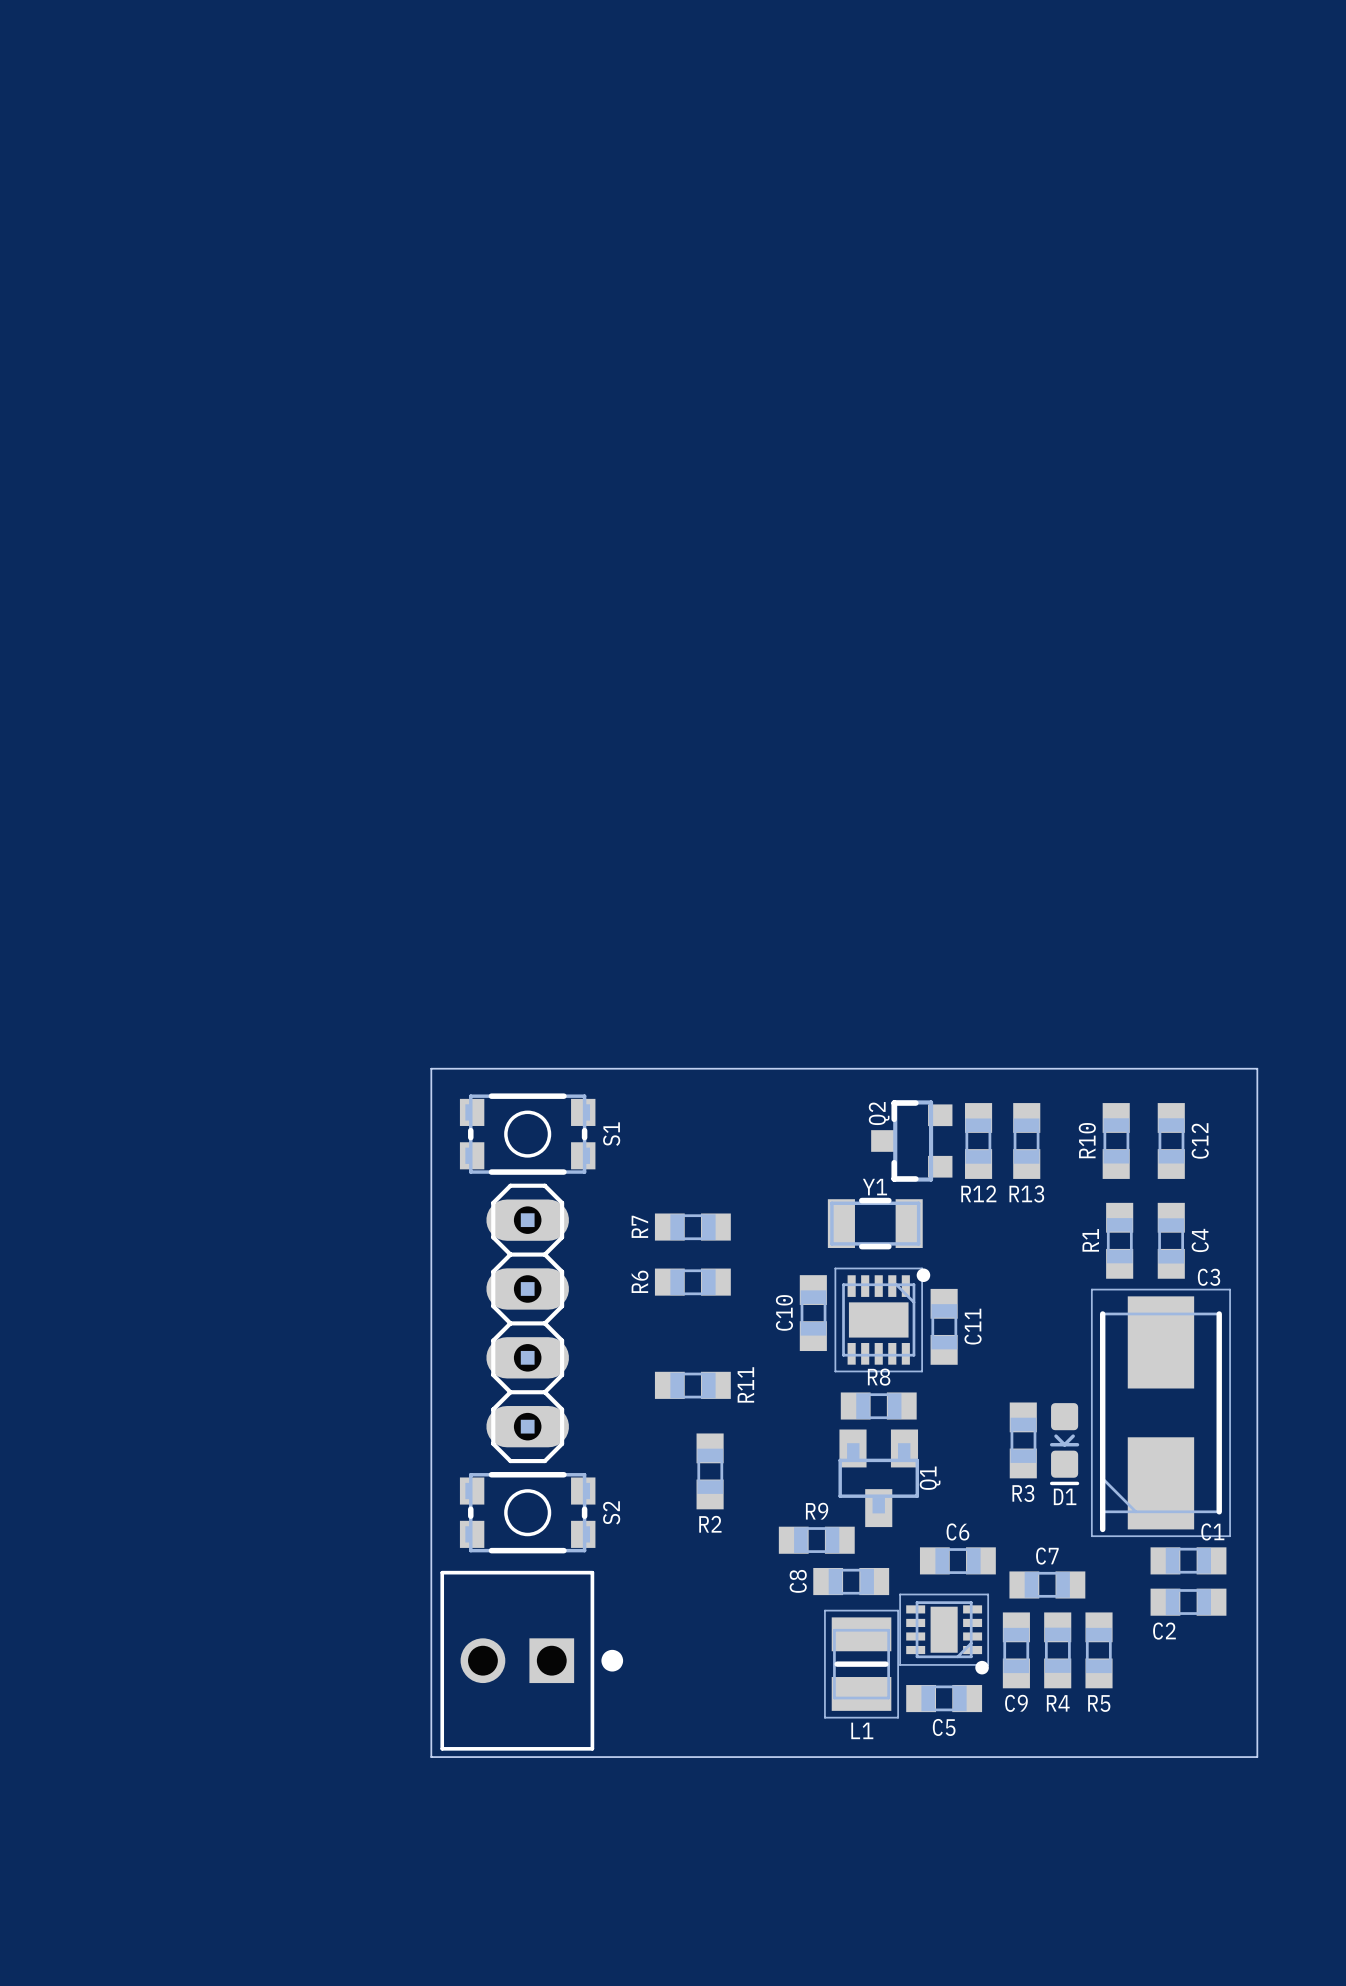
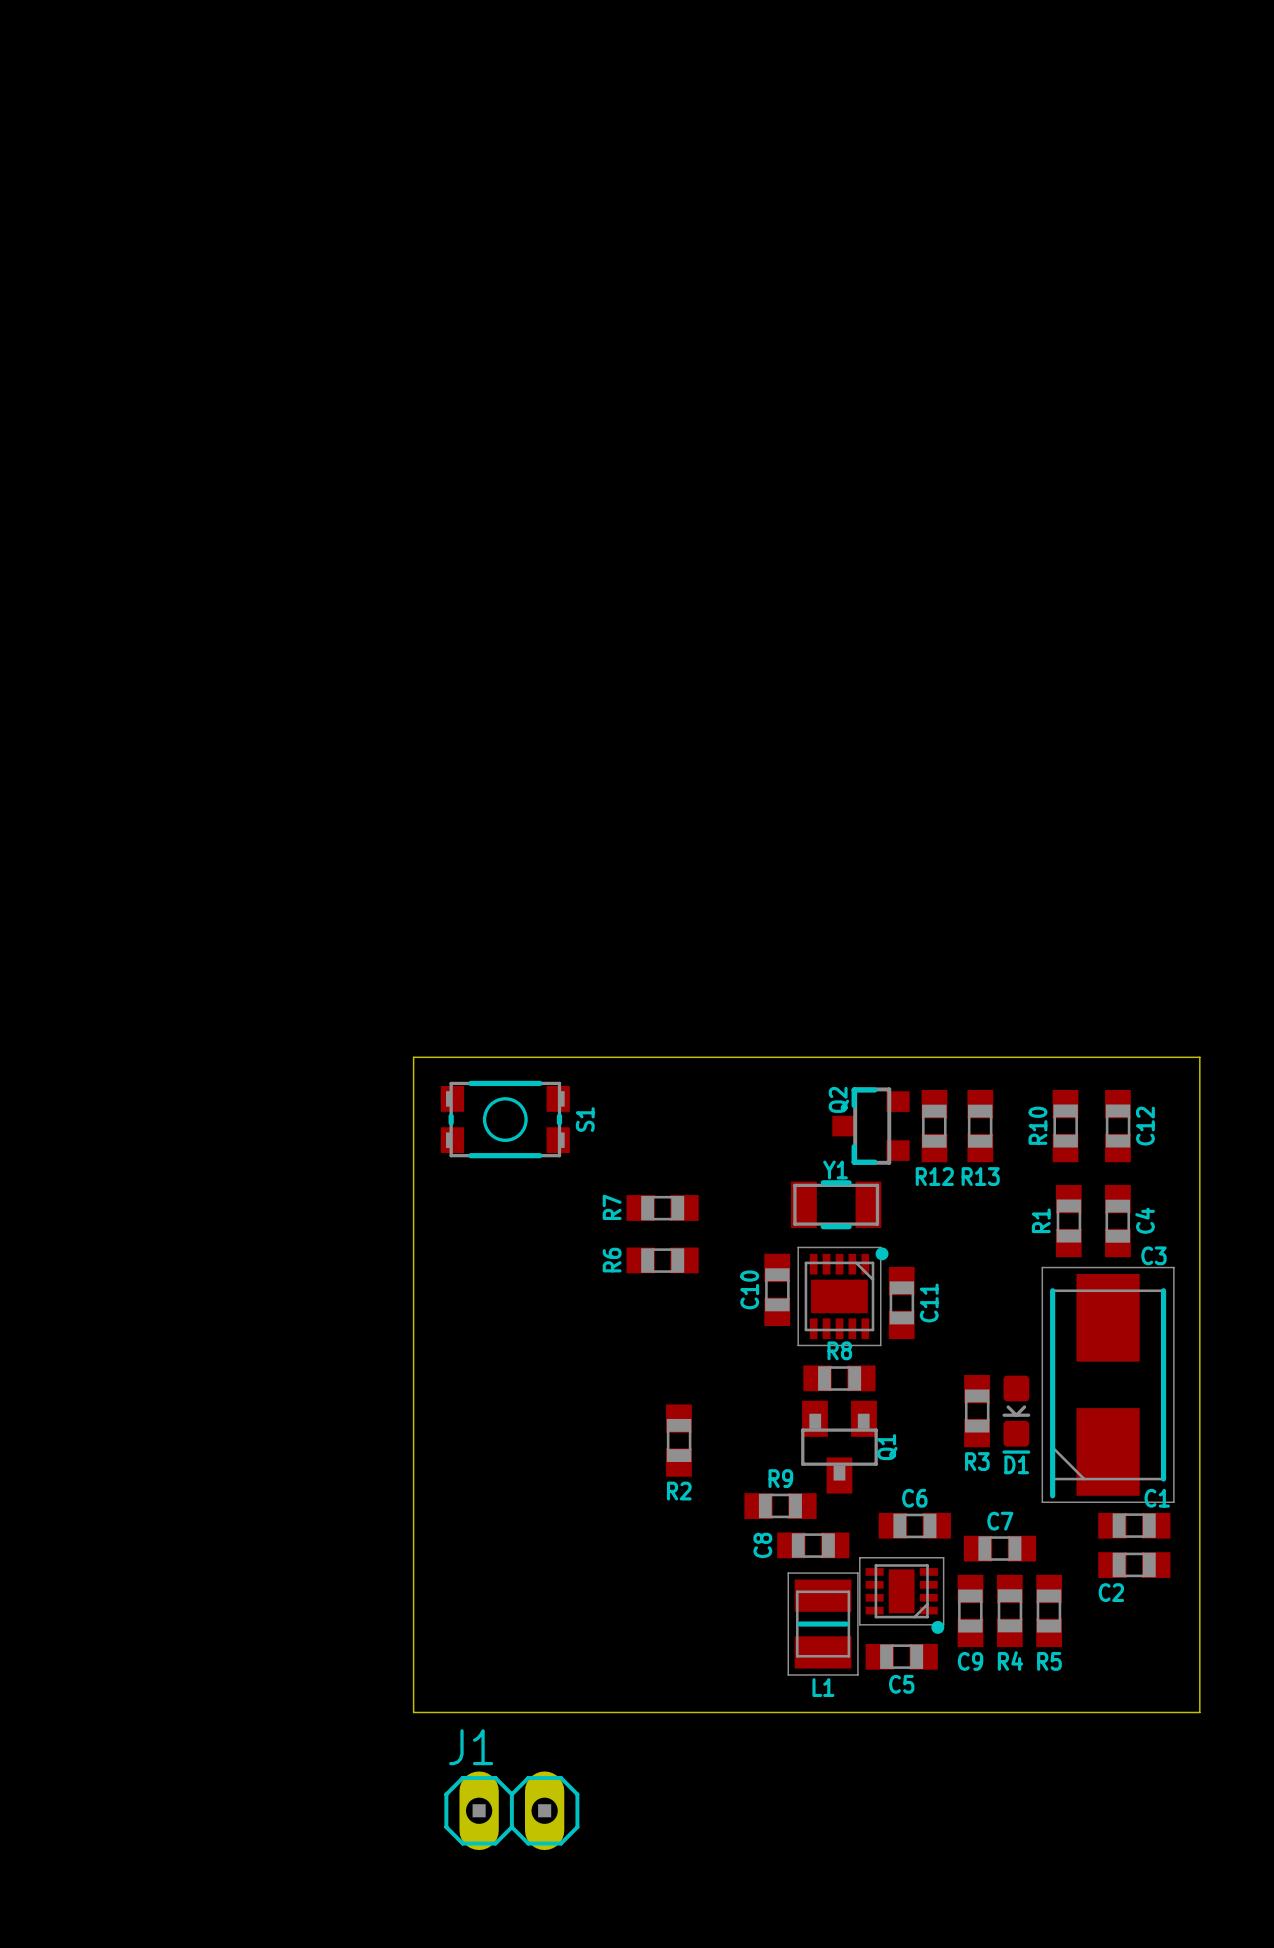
part: (527, 1323) -> none
R11: (692, 1385) -> none
S2: (527, 1512) -> none
part: (531, 1660) -> none
J1: none -> (511, 1810)

